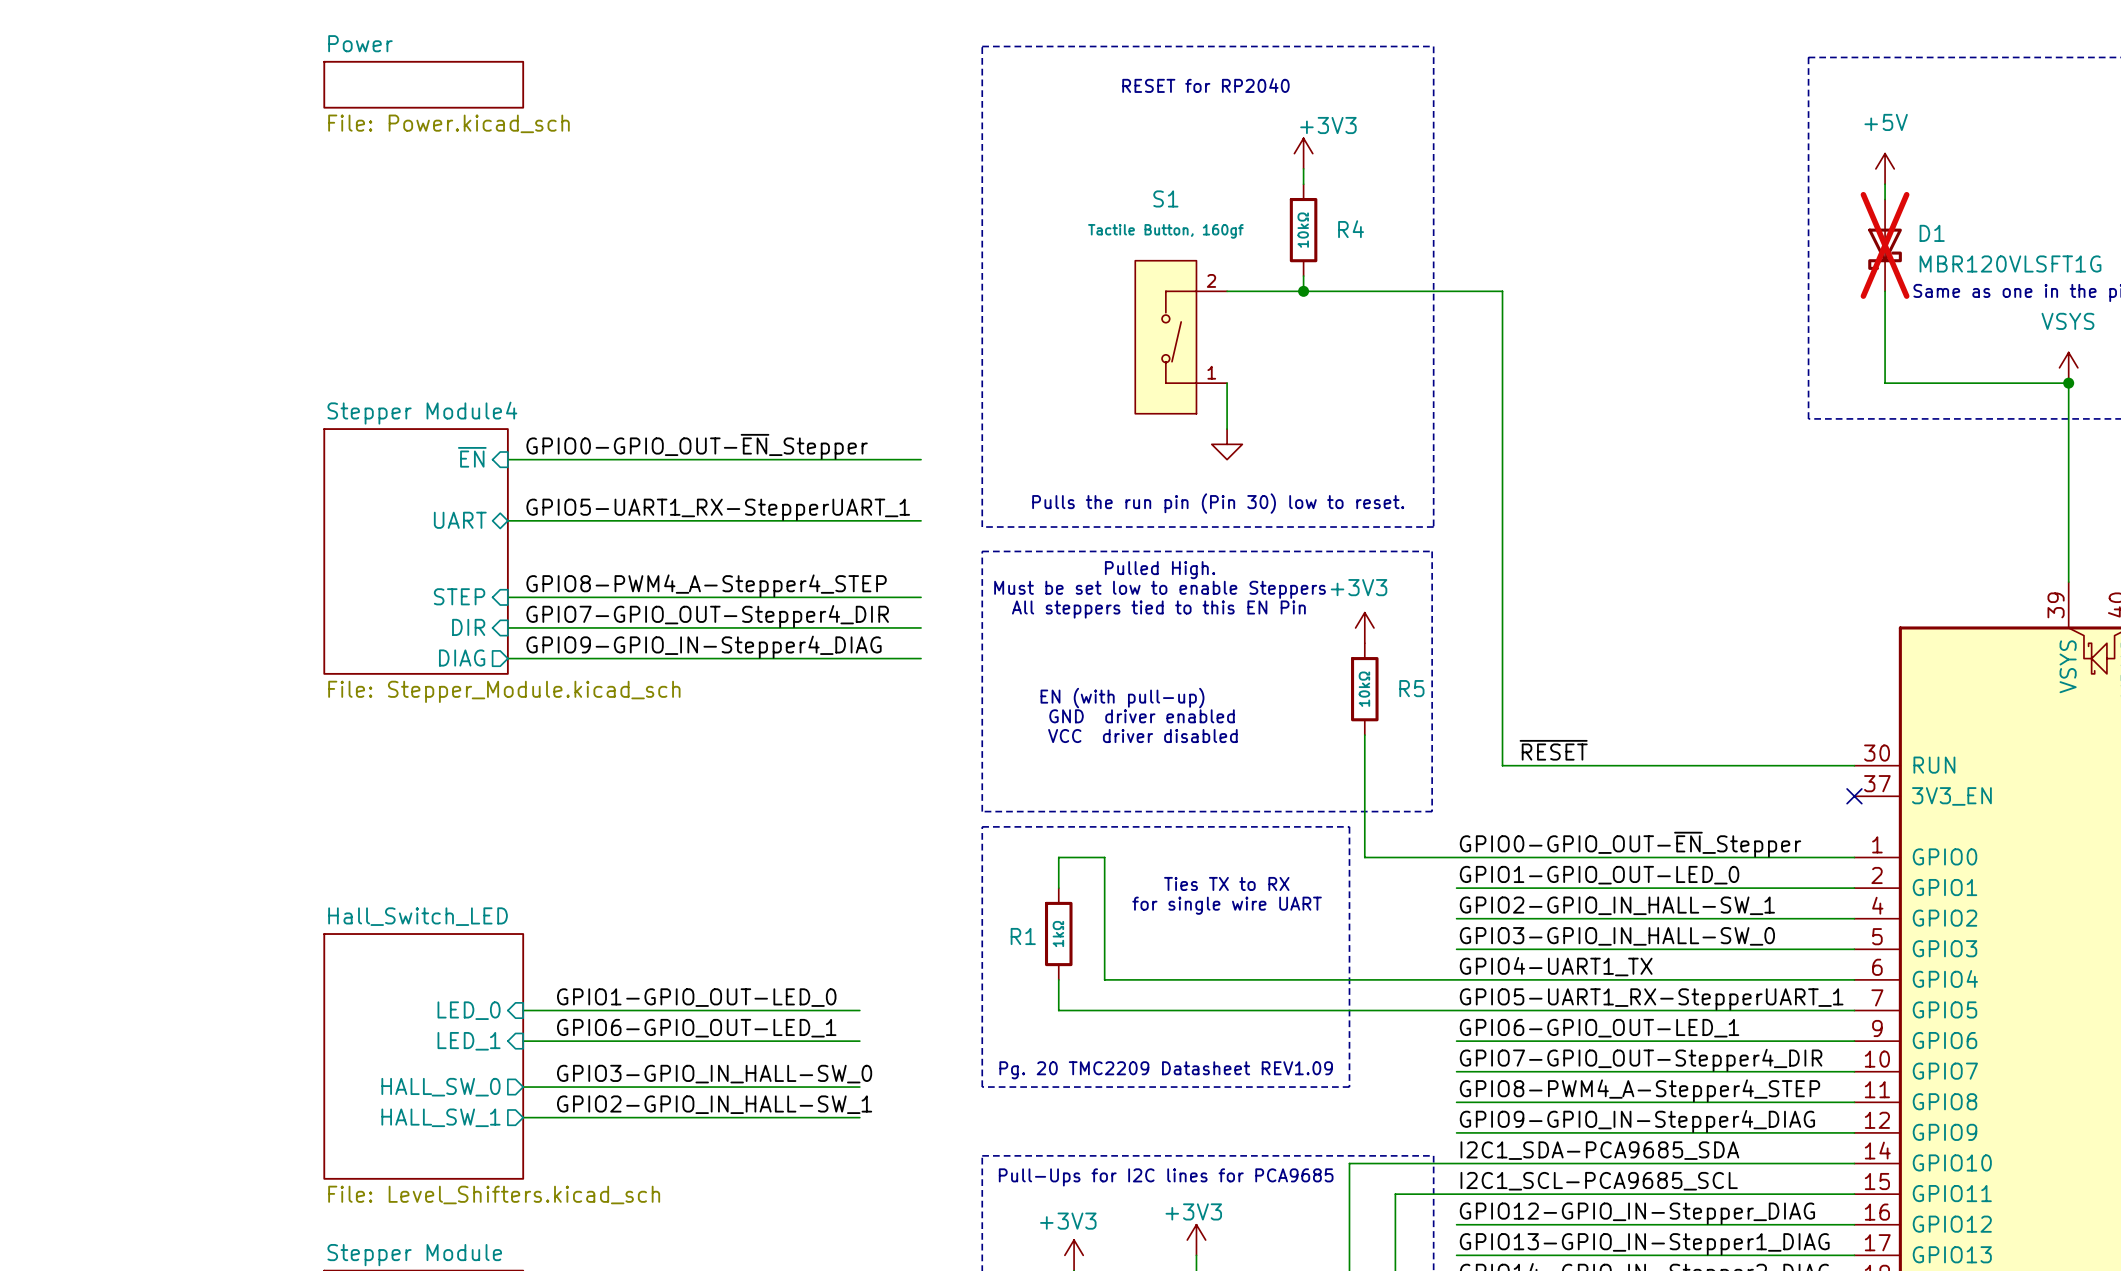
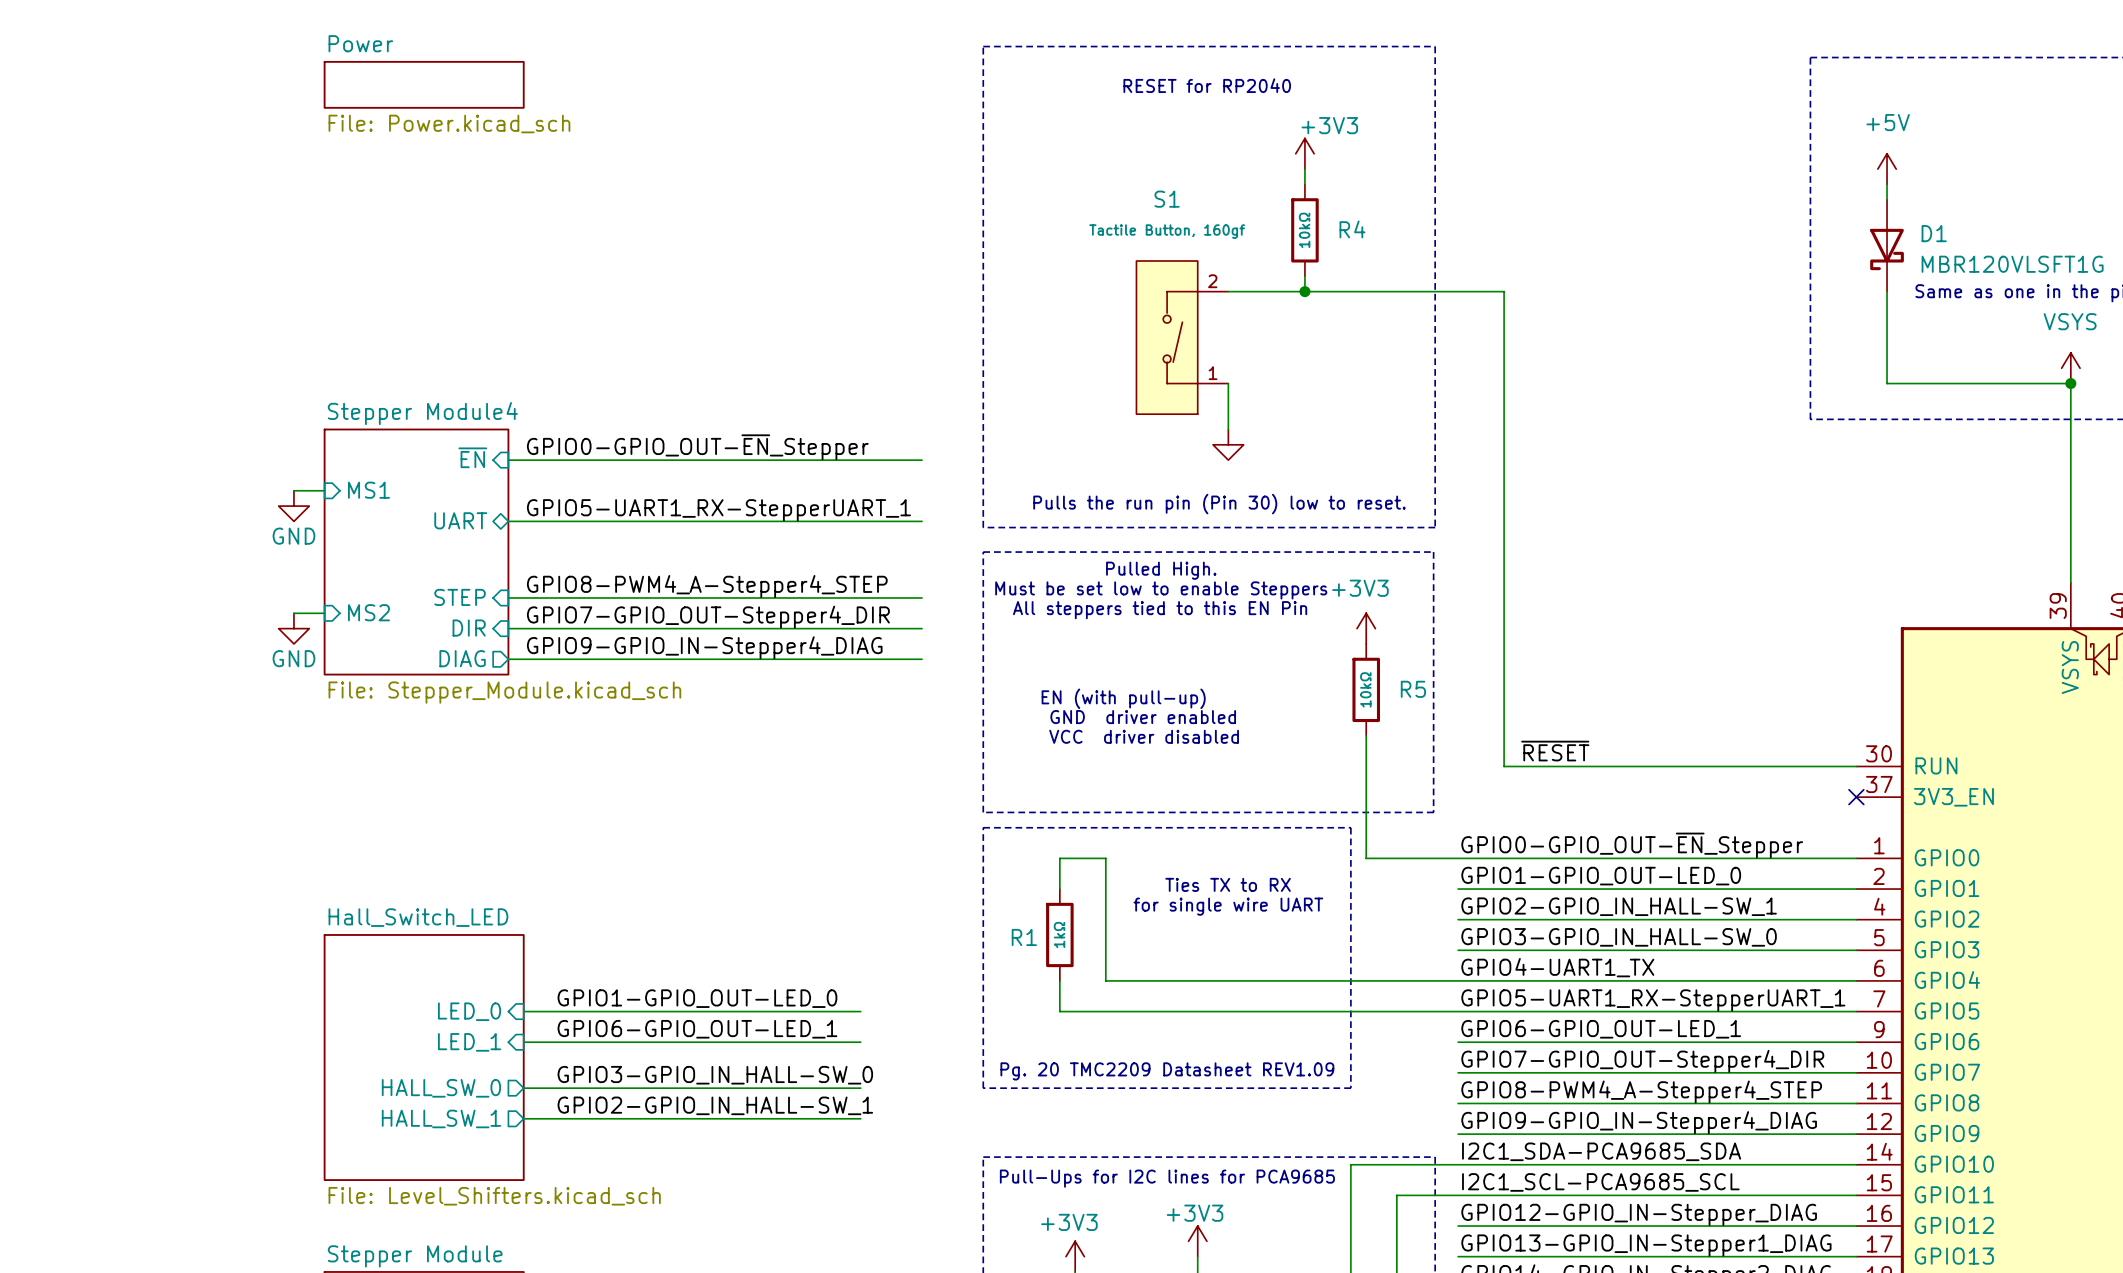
D1 do-not-place cross: (1885, 245) -> none
sheet pin: none -> MS1 (368, 490)
wire: none -> (293, 490) (324, 490)
power symbol: none -> GND (293, 506)
wire: none -> (293, 613) (324, 613)
sheet pin: none -> MS2 (368, 612)
power symbol: none -> GND (293, 628)

